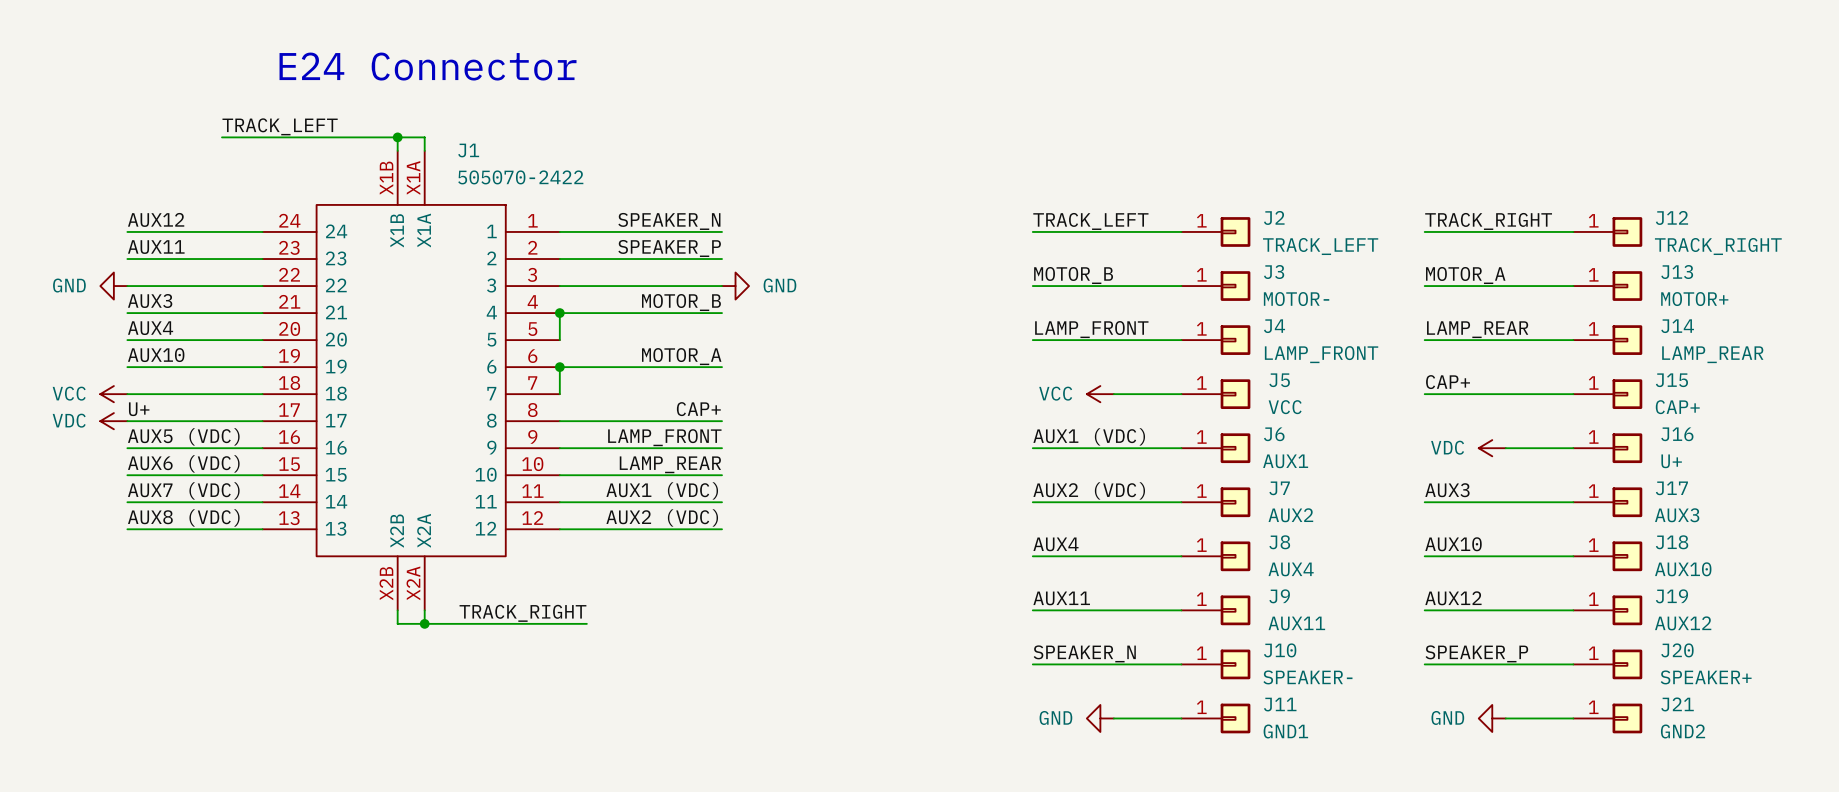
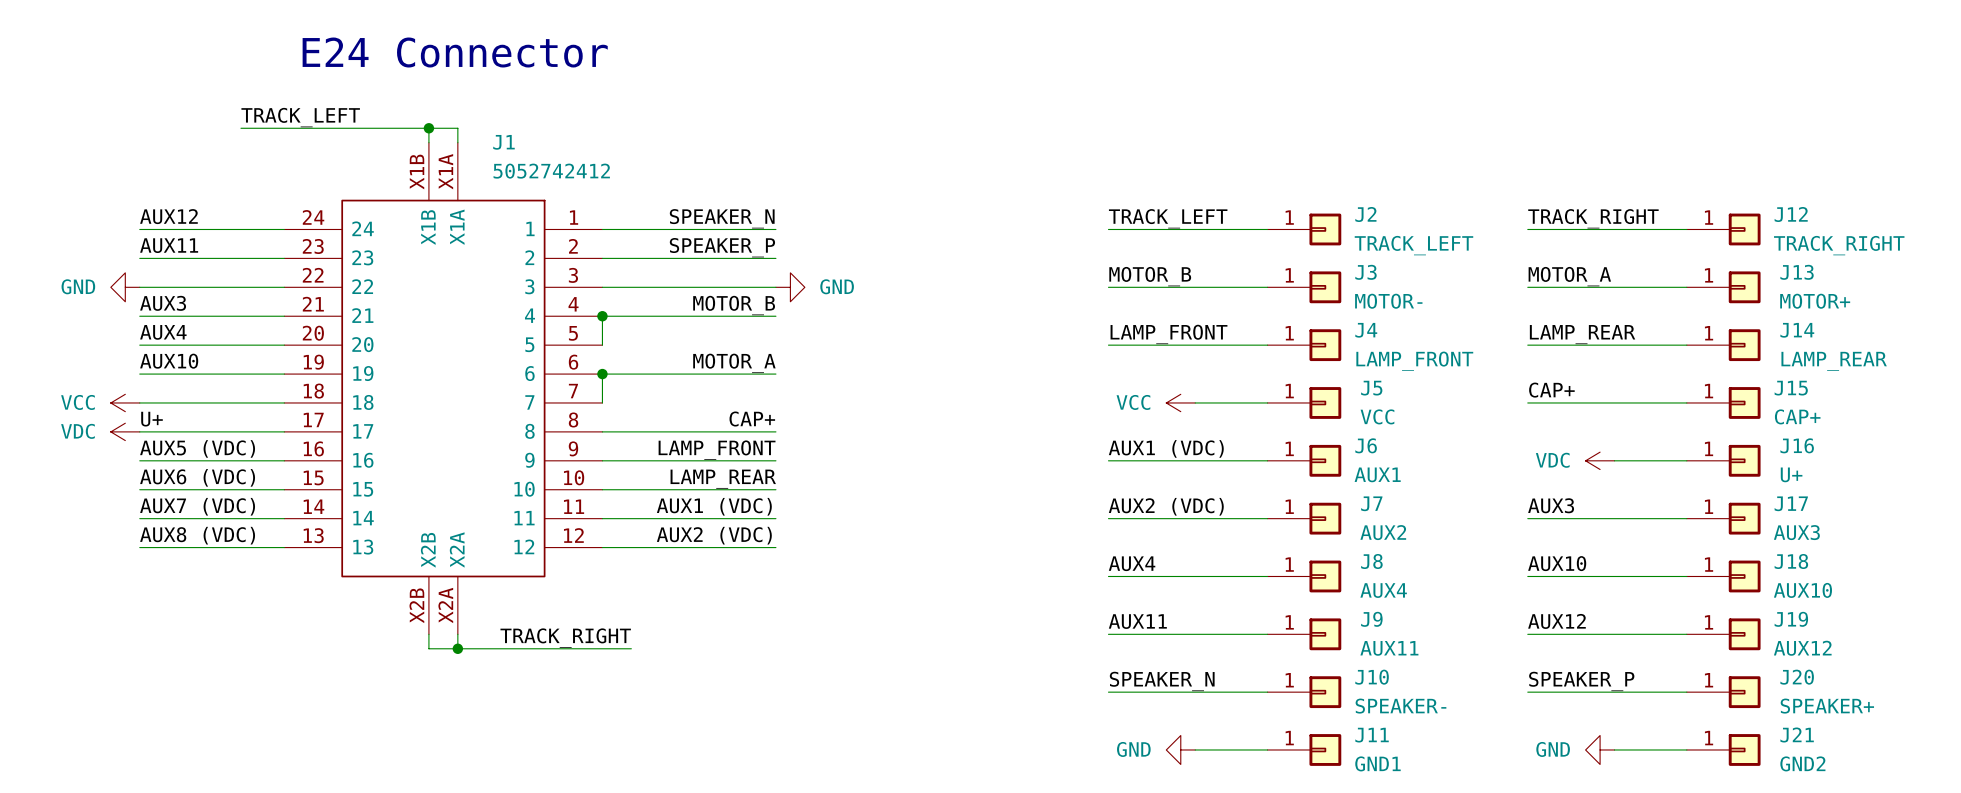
J1 value: 505070-2422 (520, 177) -> 5052742412 (551, 171)

